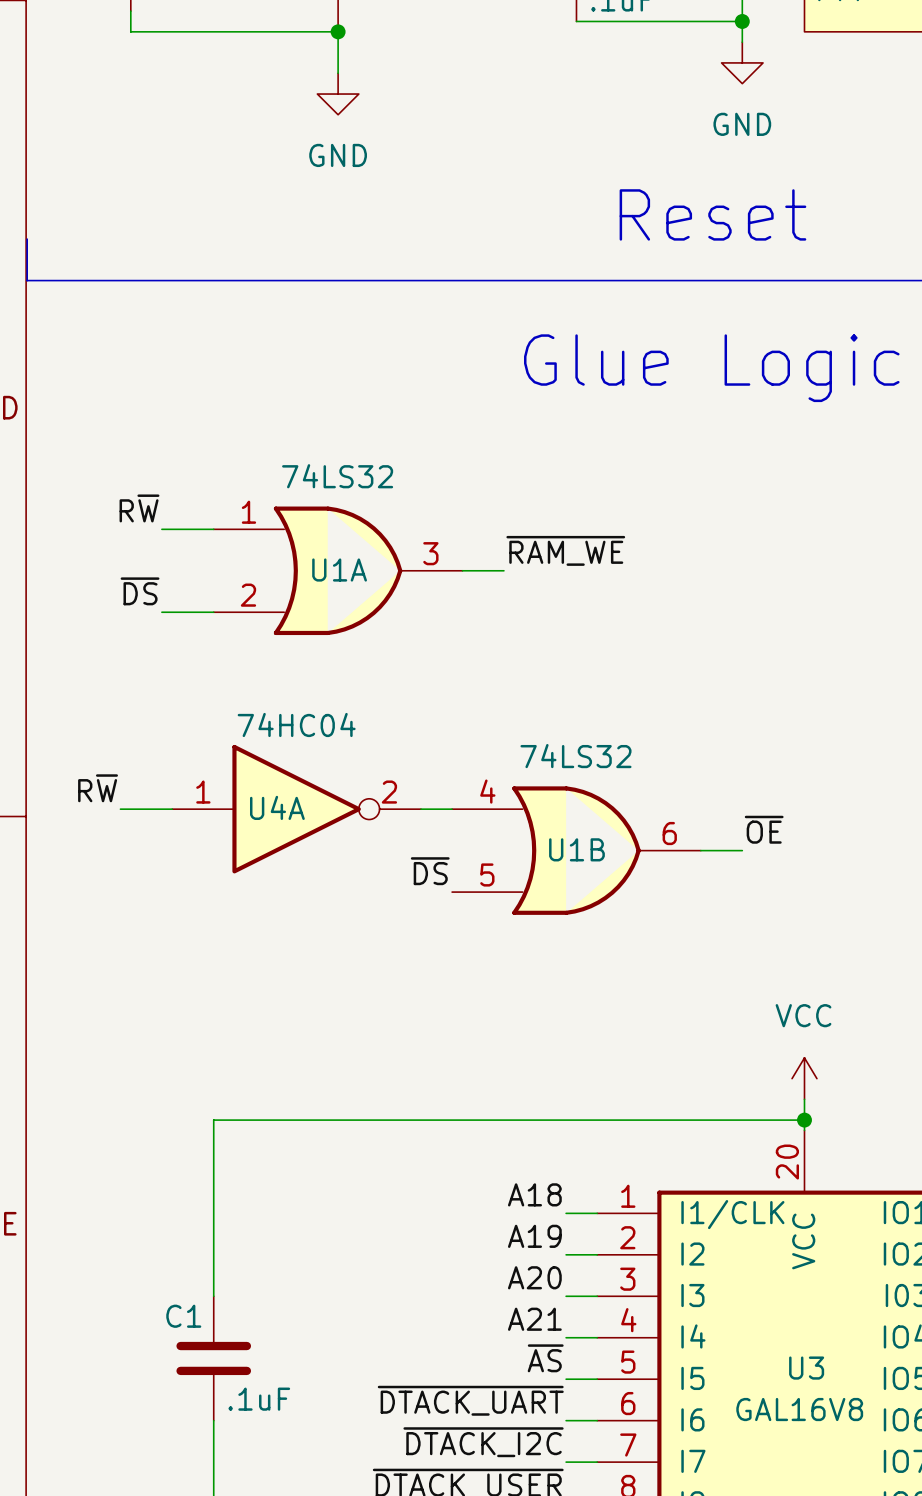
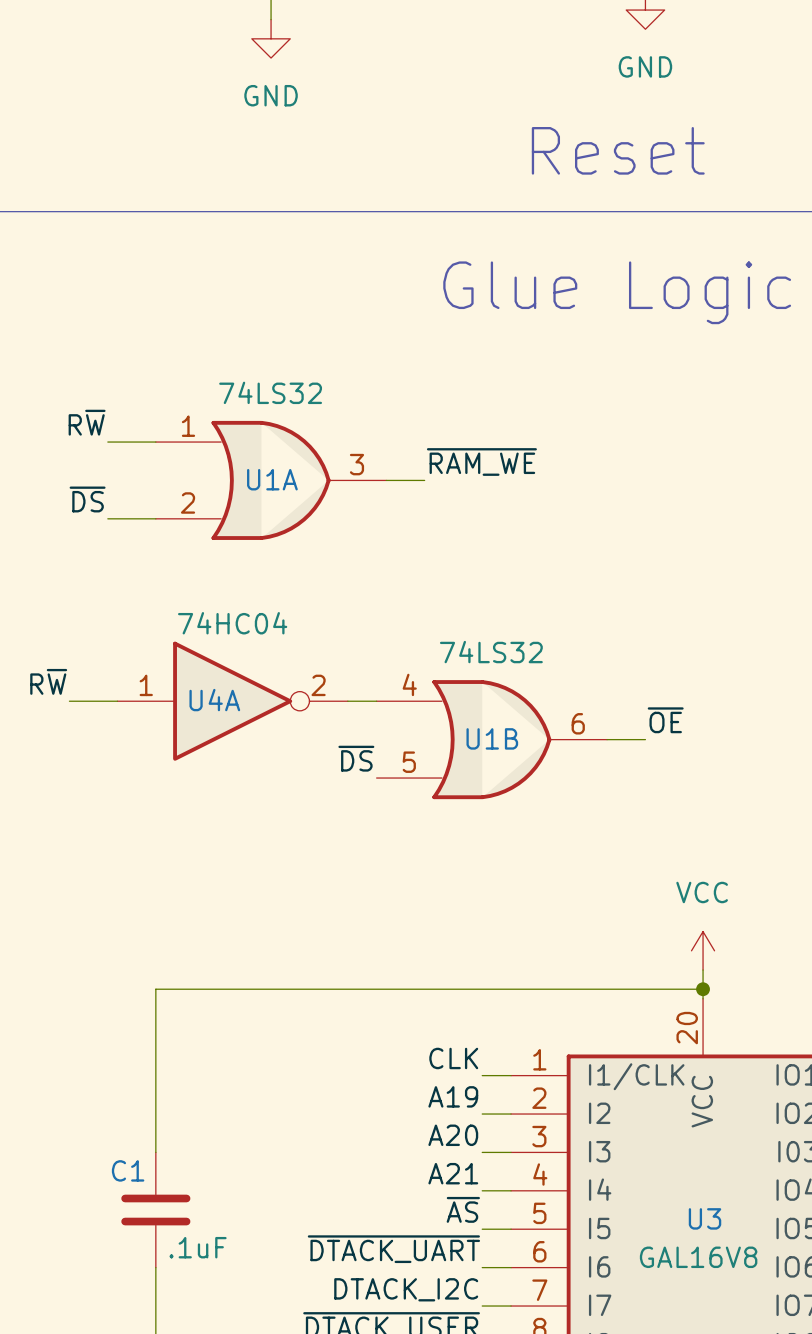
label: A18 (534, 1194) -> CLK (453, 1058)
label: ~{DTACK_I2C} (483, 1442) -> DTACK_I2C (406, 1289)

